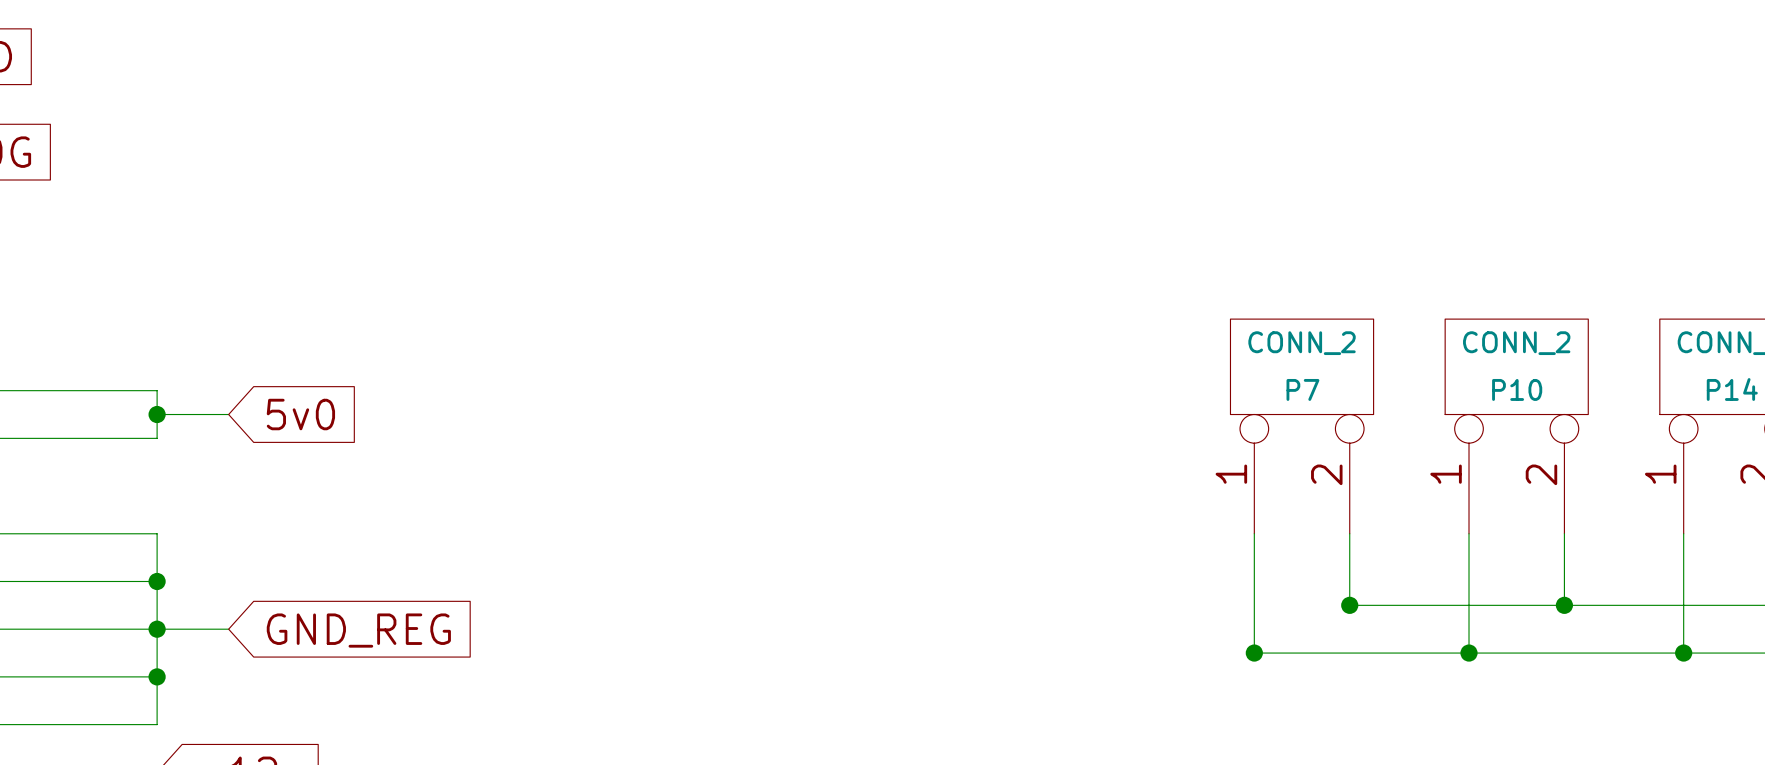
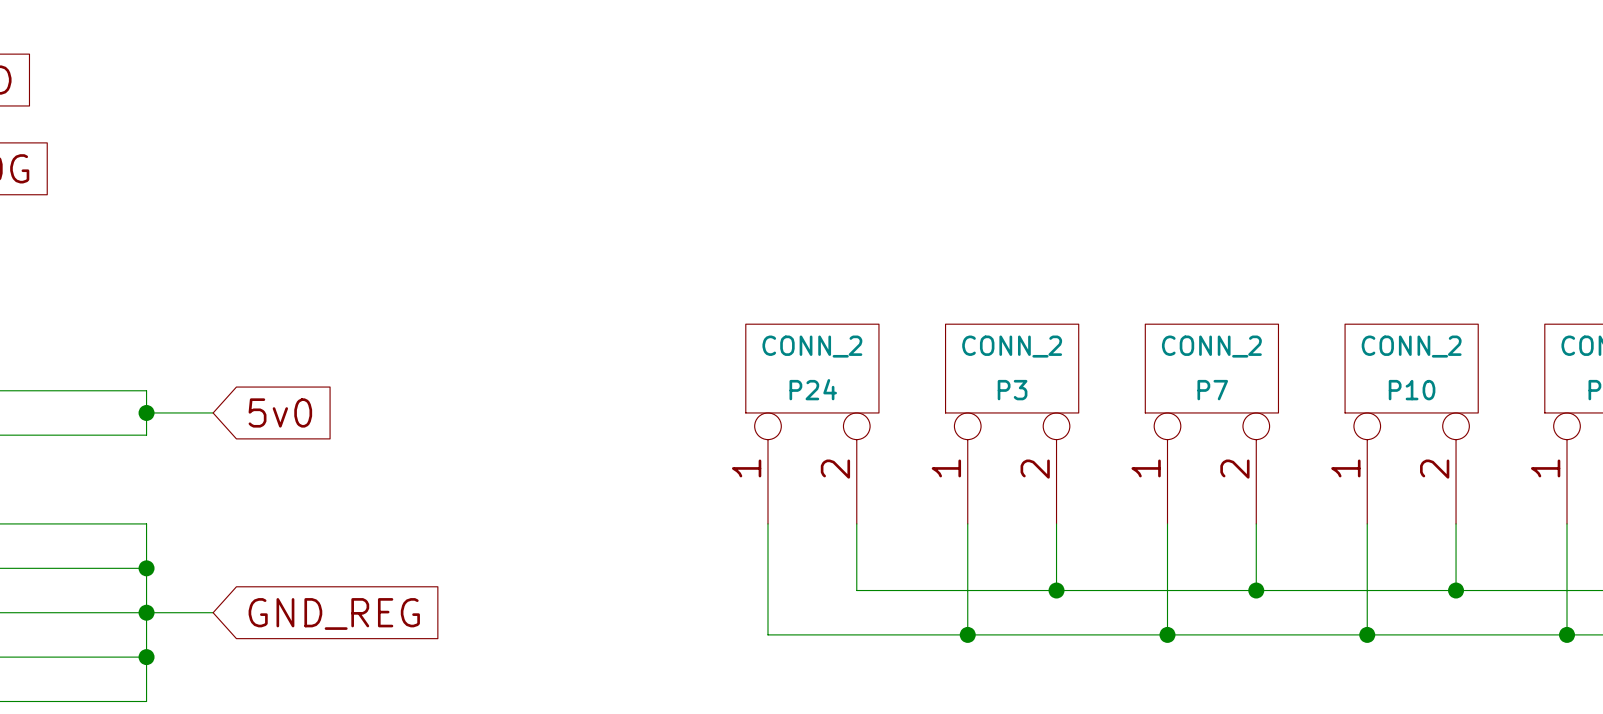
P24: none -> CONN_2 (812, 424)
P3: none -> CONN_2 (1012, 424)
wire: none -> (767, 523) (767, 634) (1167, 634)
wire: none -> (856, 523) (856, 590) (1256, 590)
wire: none -> (967, 523) (967, 634)
wire: none -> (1056, 523) (1056, 590)
junction: none -> (1056, 590)
junction: none -> (967, 634)

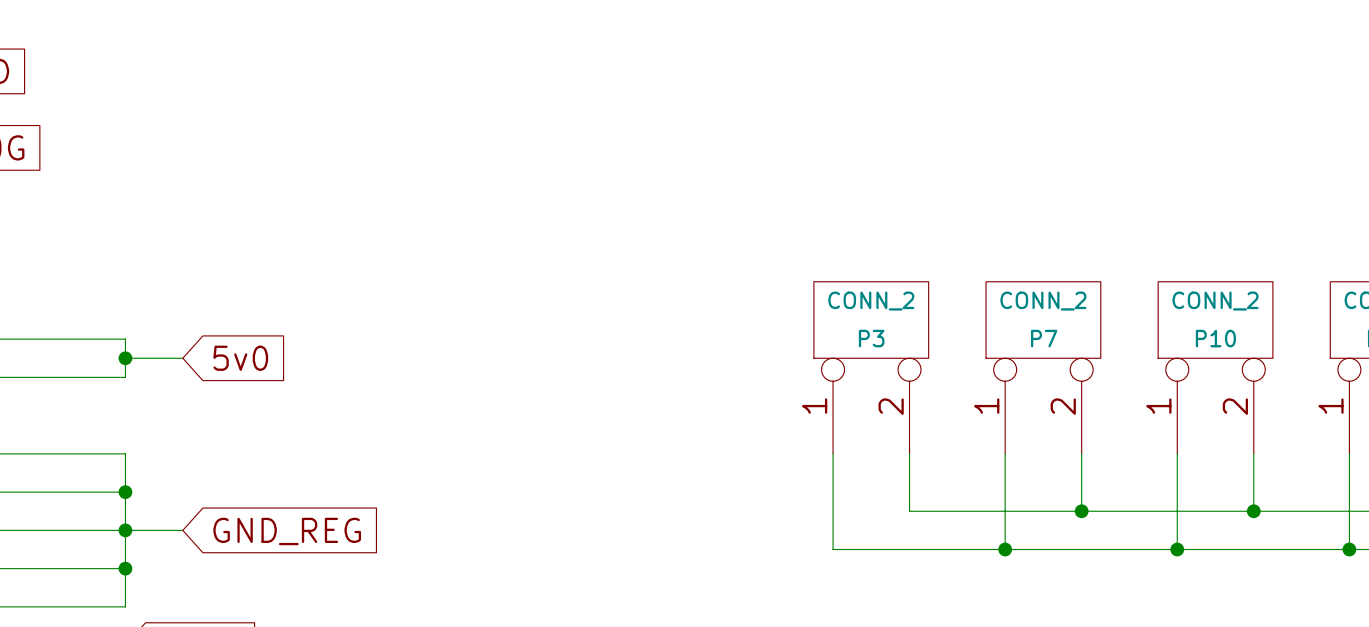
P24: CONN_2 (812, 424) -> none
wire: (767, 523) (767, 634) (967, 634) -> none
wire: (856, 523) (856, 590) (1056, 590) -> none
junction: (1056, 590) -> none
junction: (967, 634) -> none

